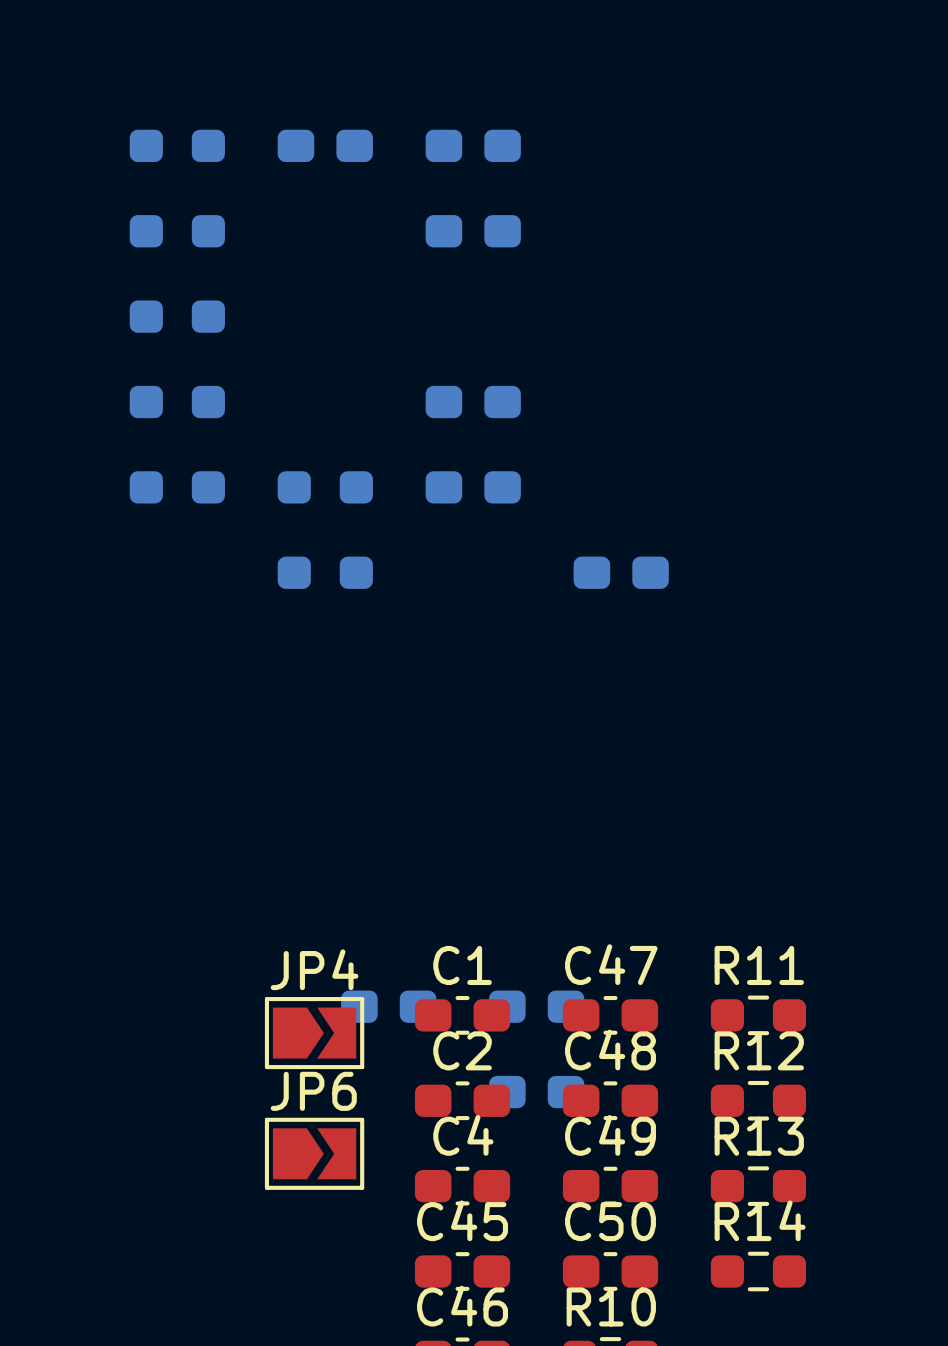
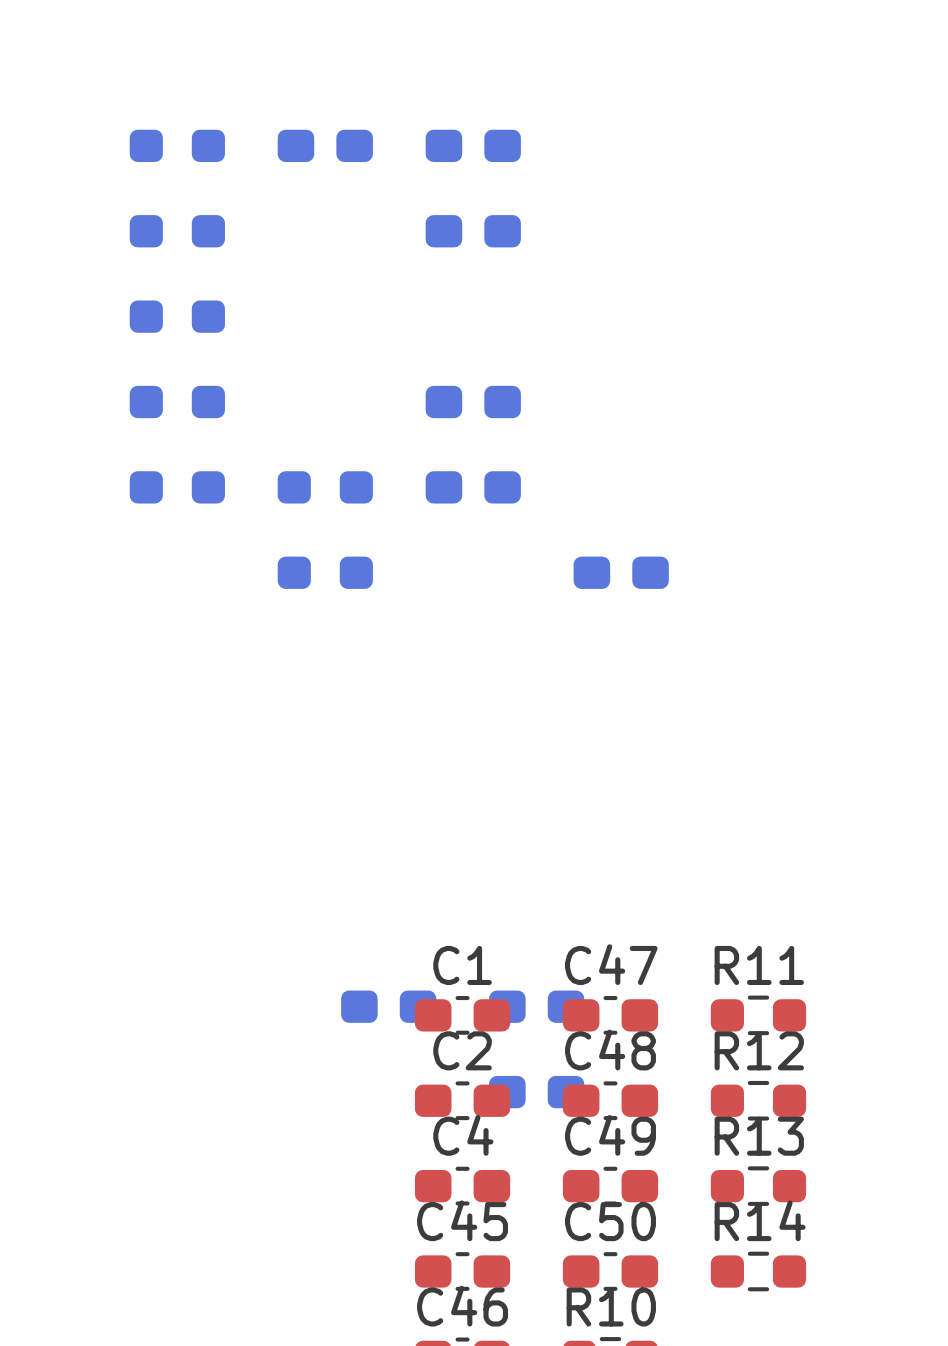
JP4: (314, 1033) -> none
JP6: (314, 1153) -> none

